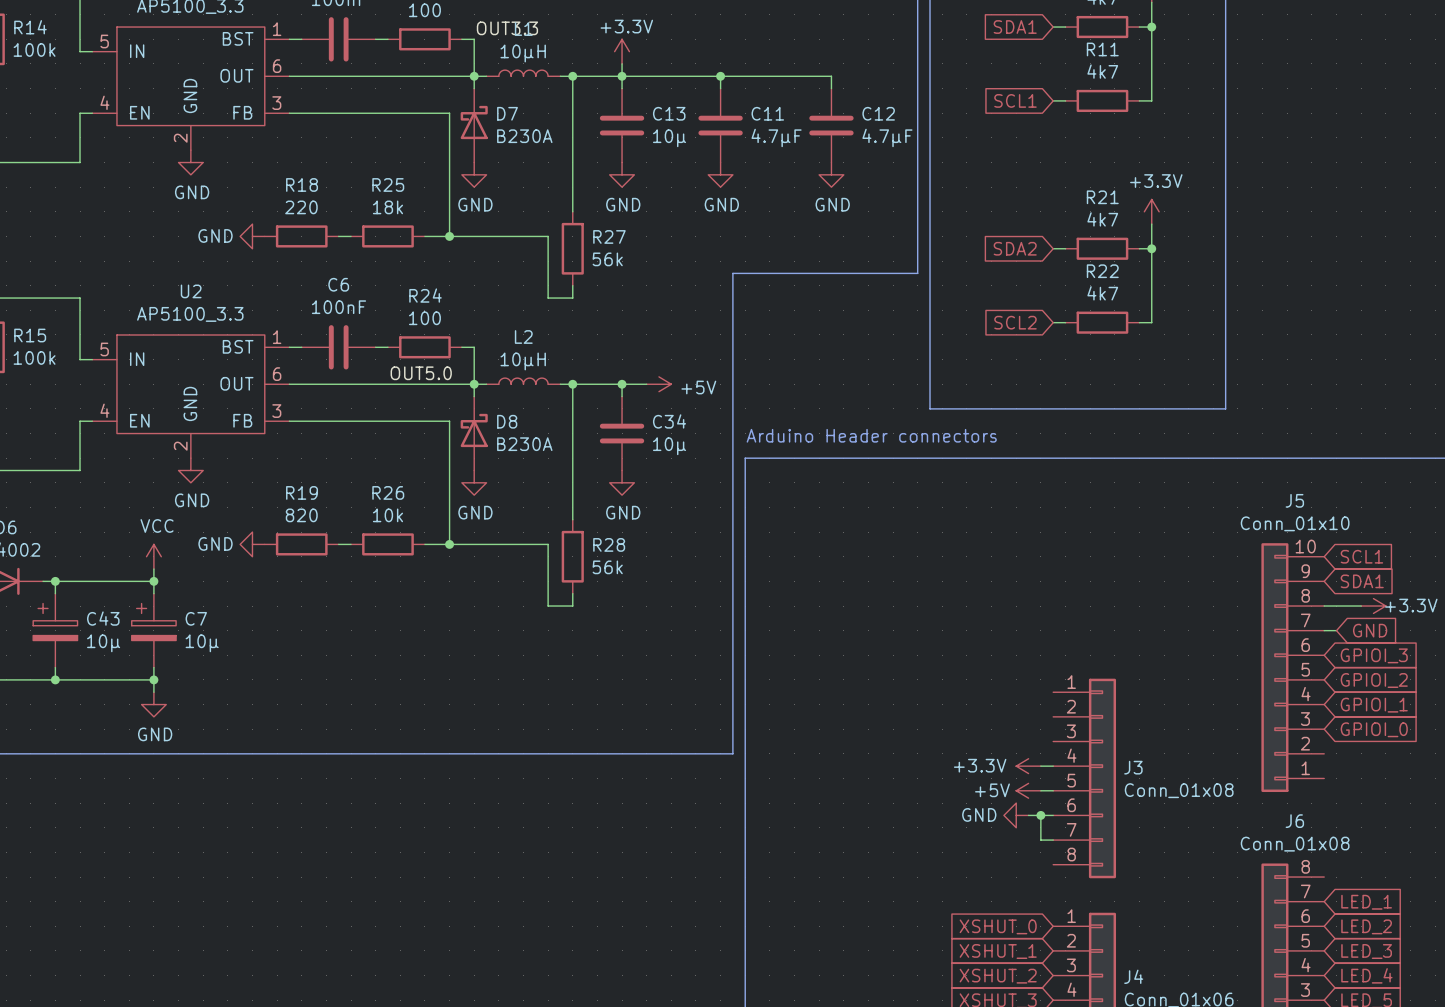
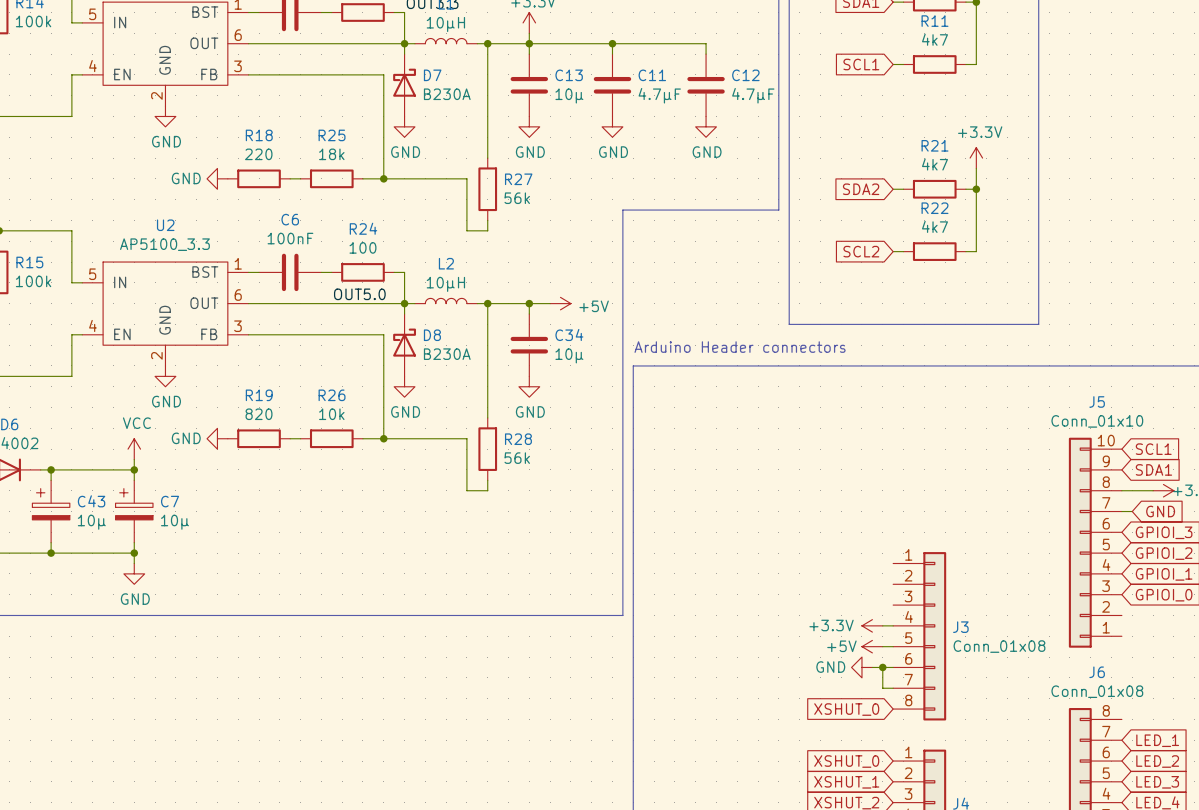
global label: none -> XSHUT_0 (846, 709)

